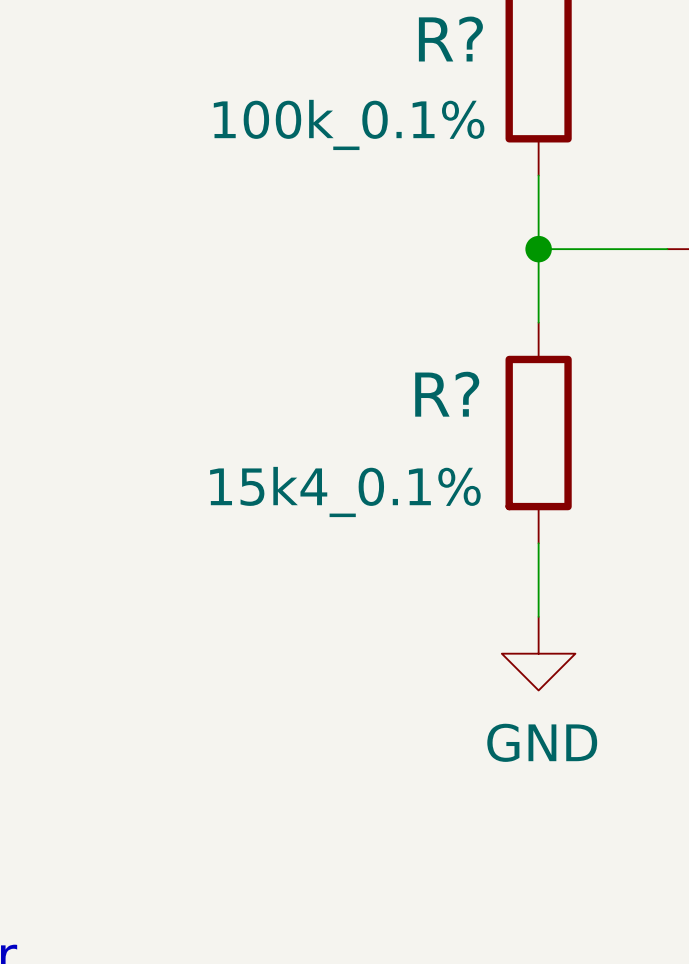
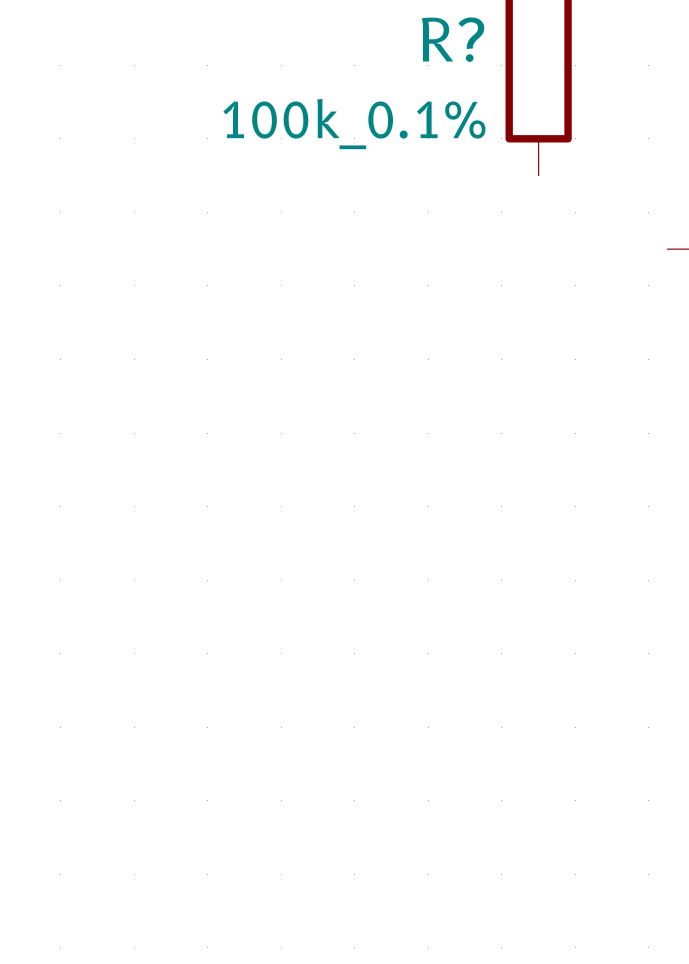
wire: (538, 175) (538, 322) -> none
wire: (538, 249) (667, 249) -> none
junction: (538, 249) -> none
R?: (538, 433) -> none
wire: (538, 543) (538, 616) -> none
power symbol: GND (538, 653) -> none

